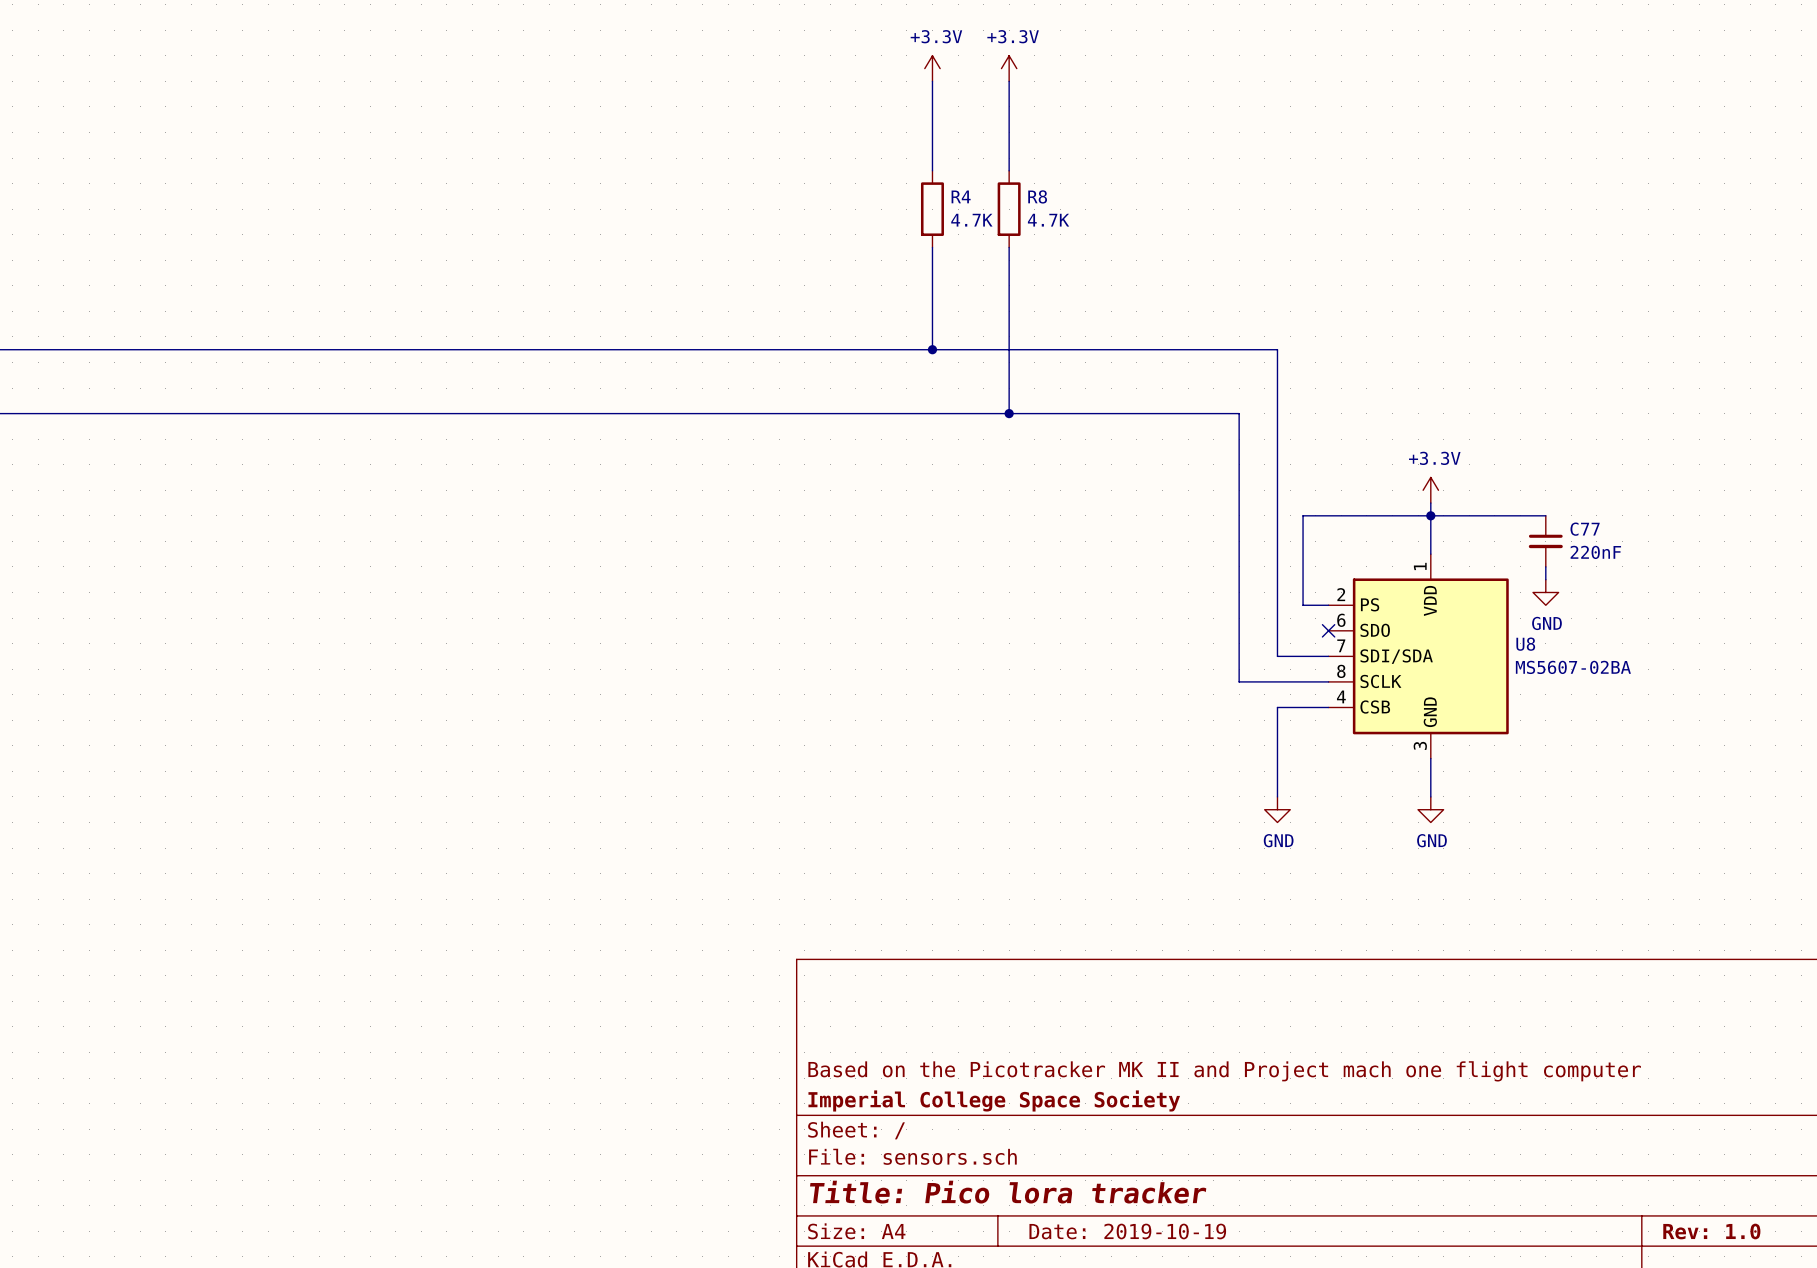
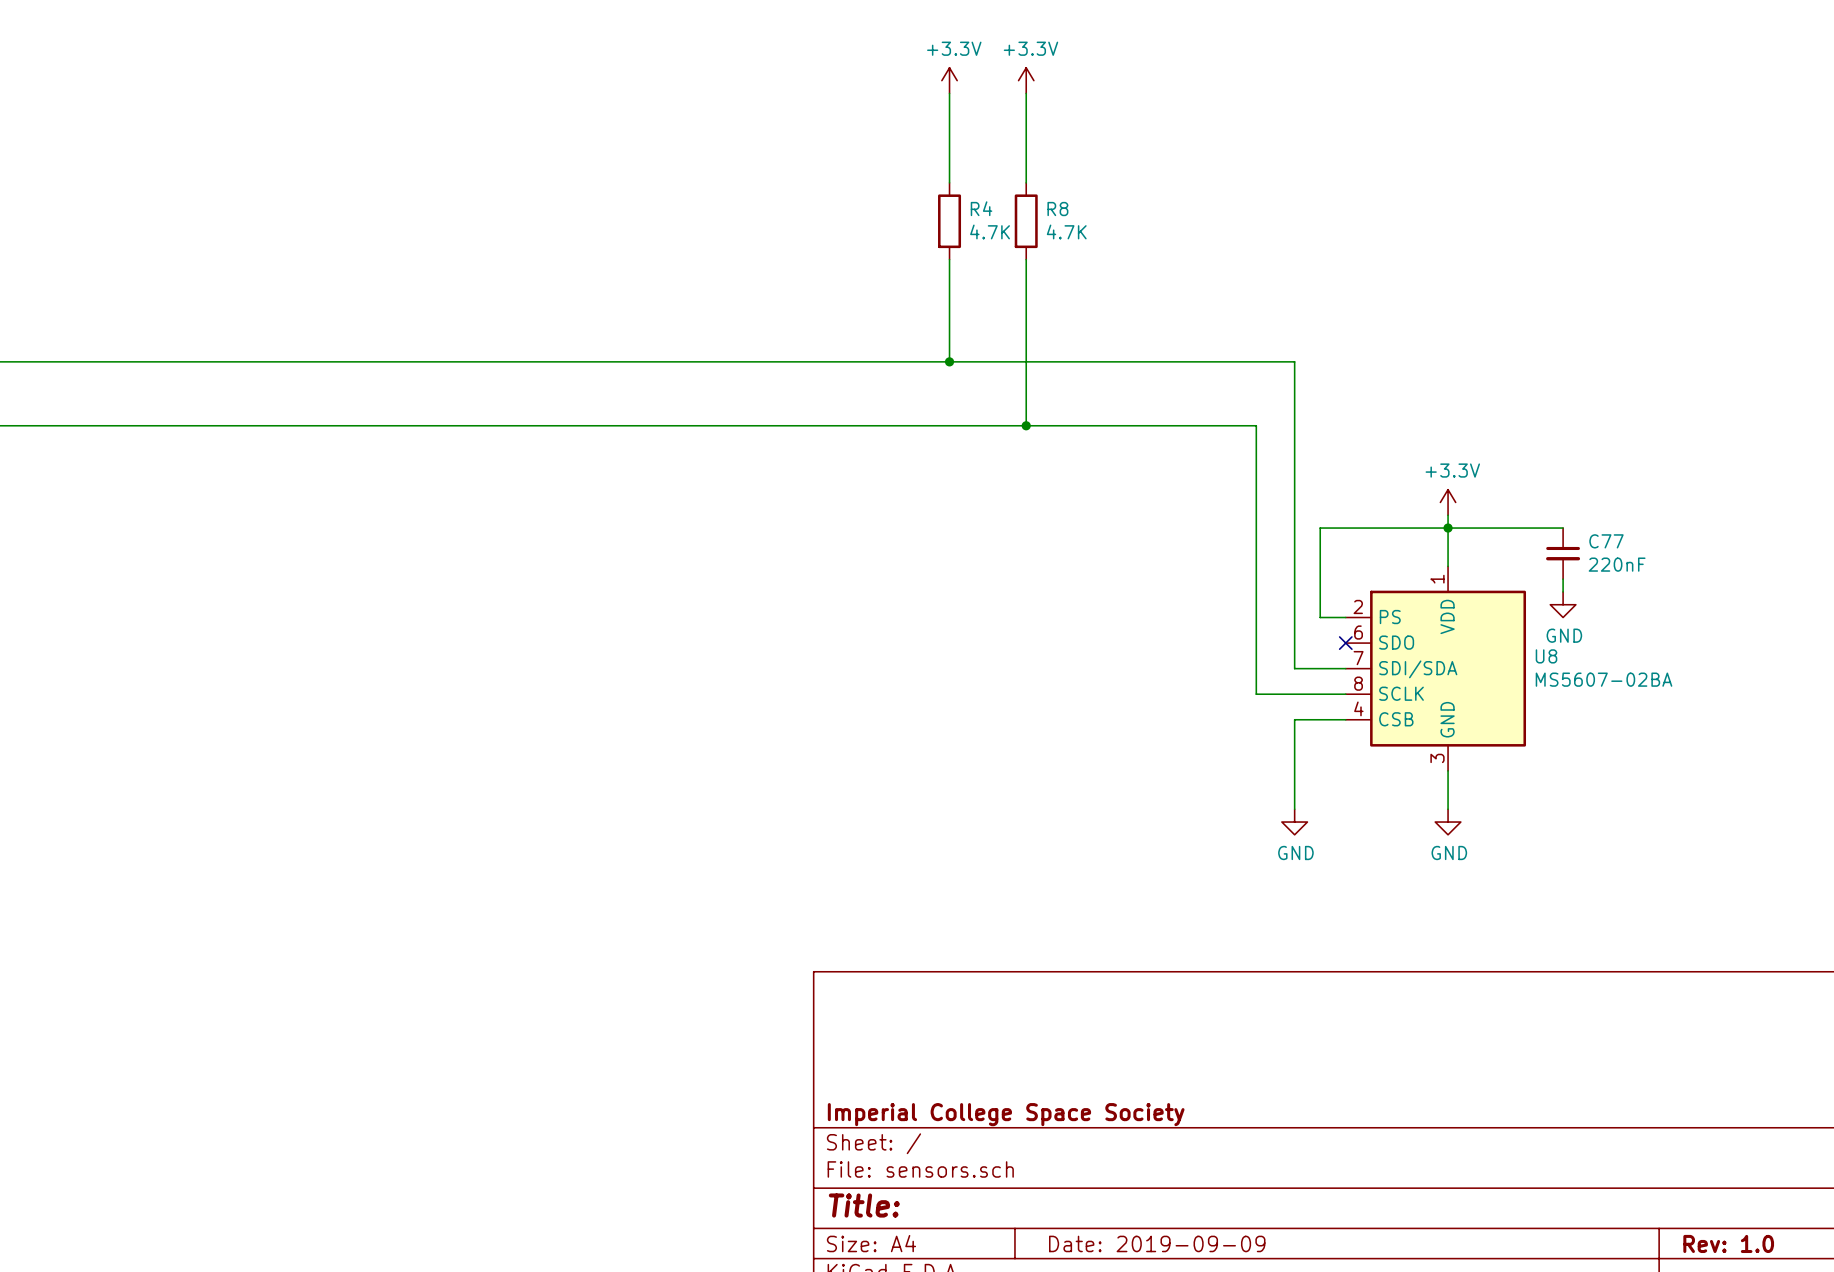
title block: Based on the Picotracker MK II and Project mach one flight computer (1224, 1071) -> none
title block: Title: Pico lora tracker (1008, 1192) -> Title: (864, 1205)
title block: Date: 2019-10-19 (1127, 1231) -> Date: 2019-09-09 (1157, 1243)

